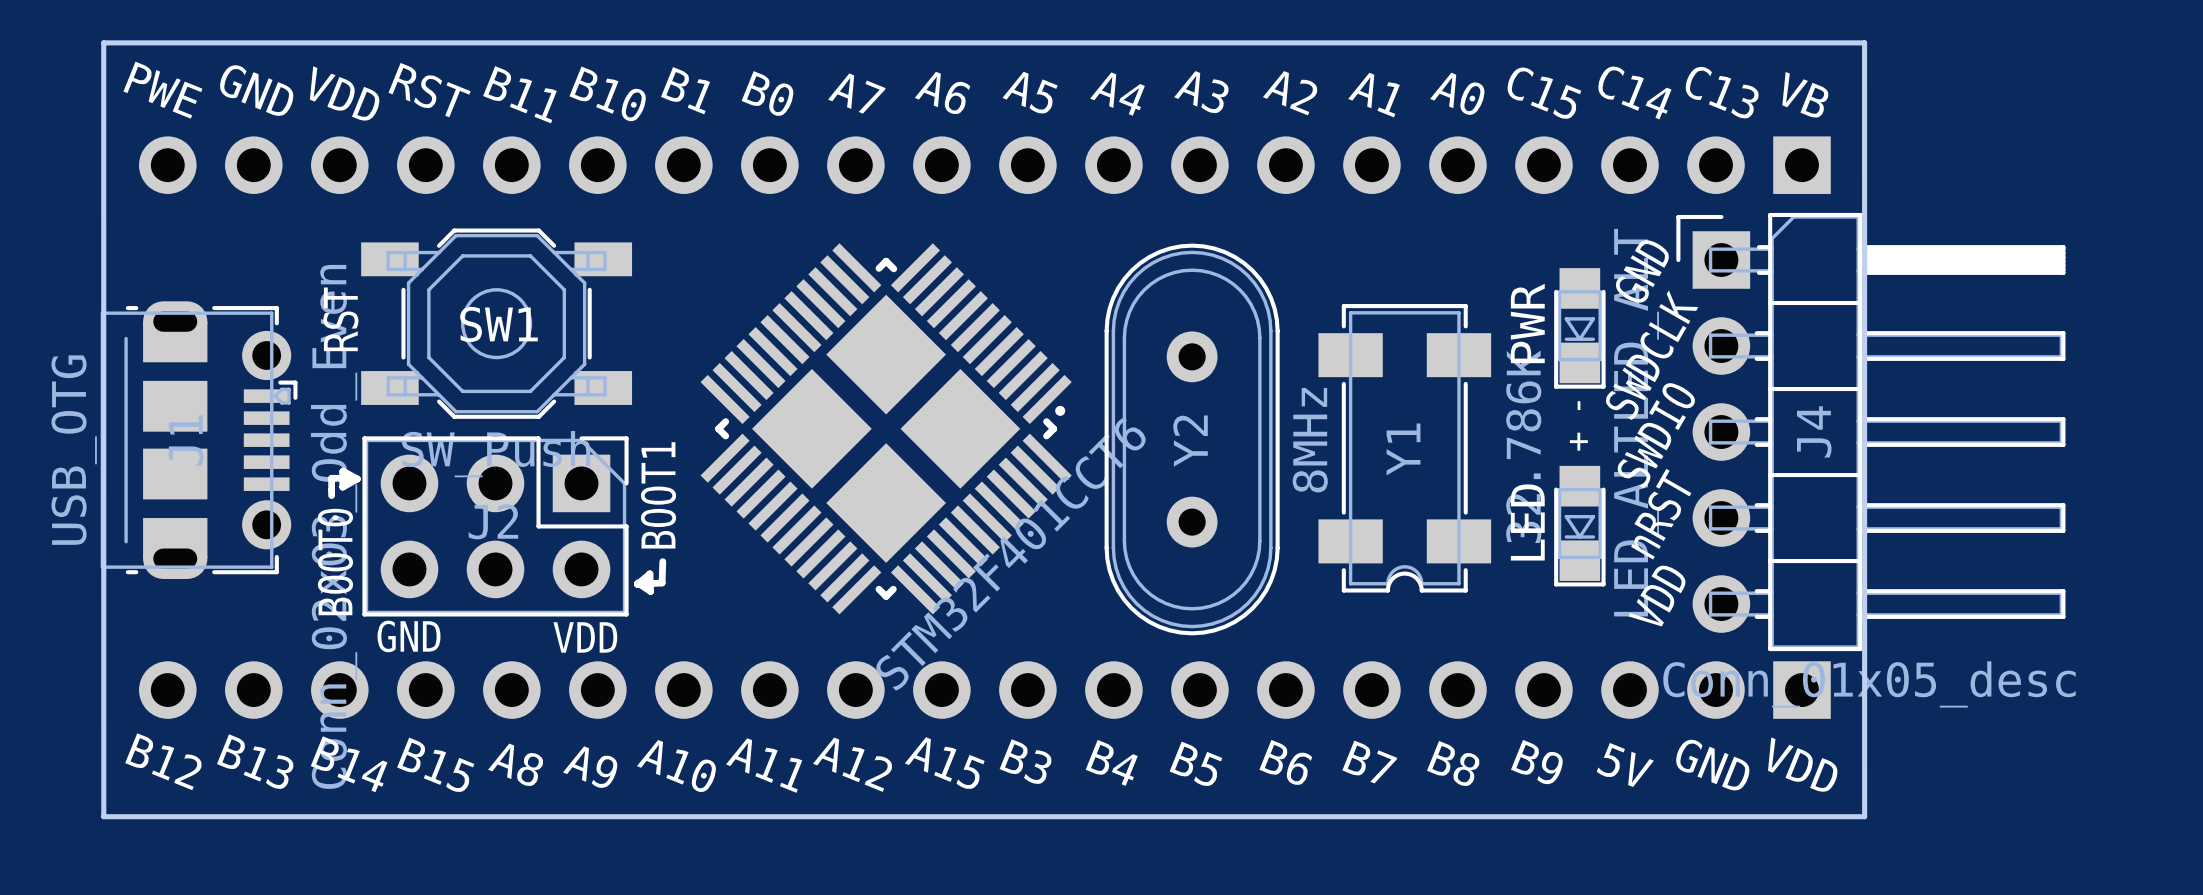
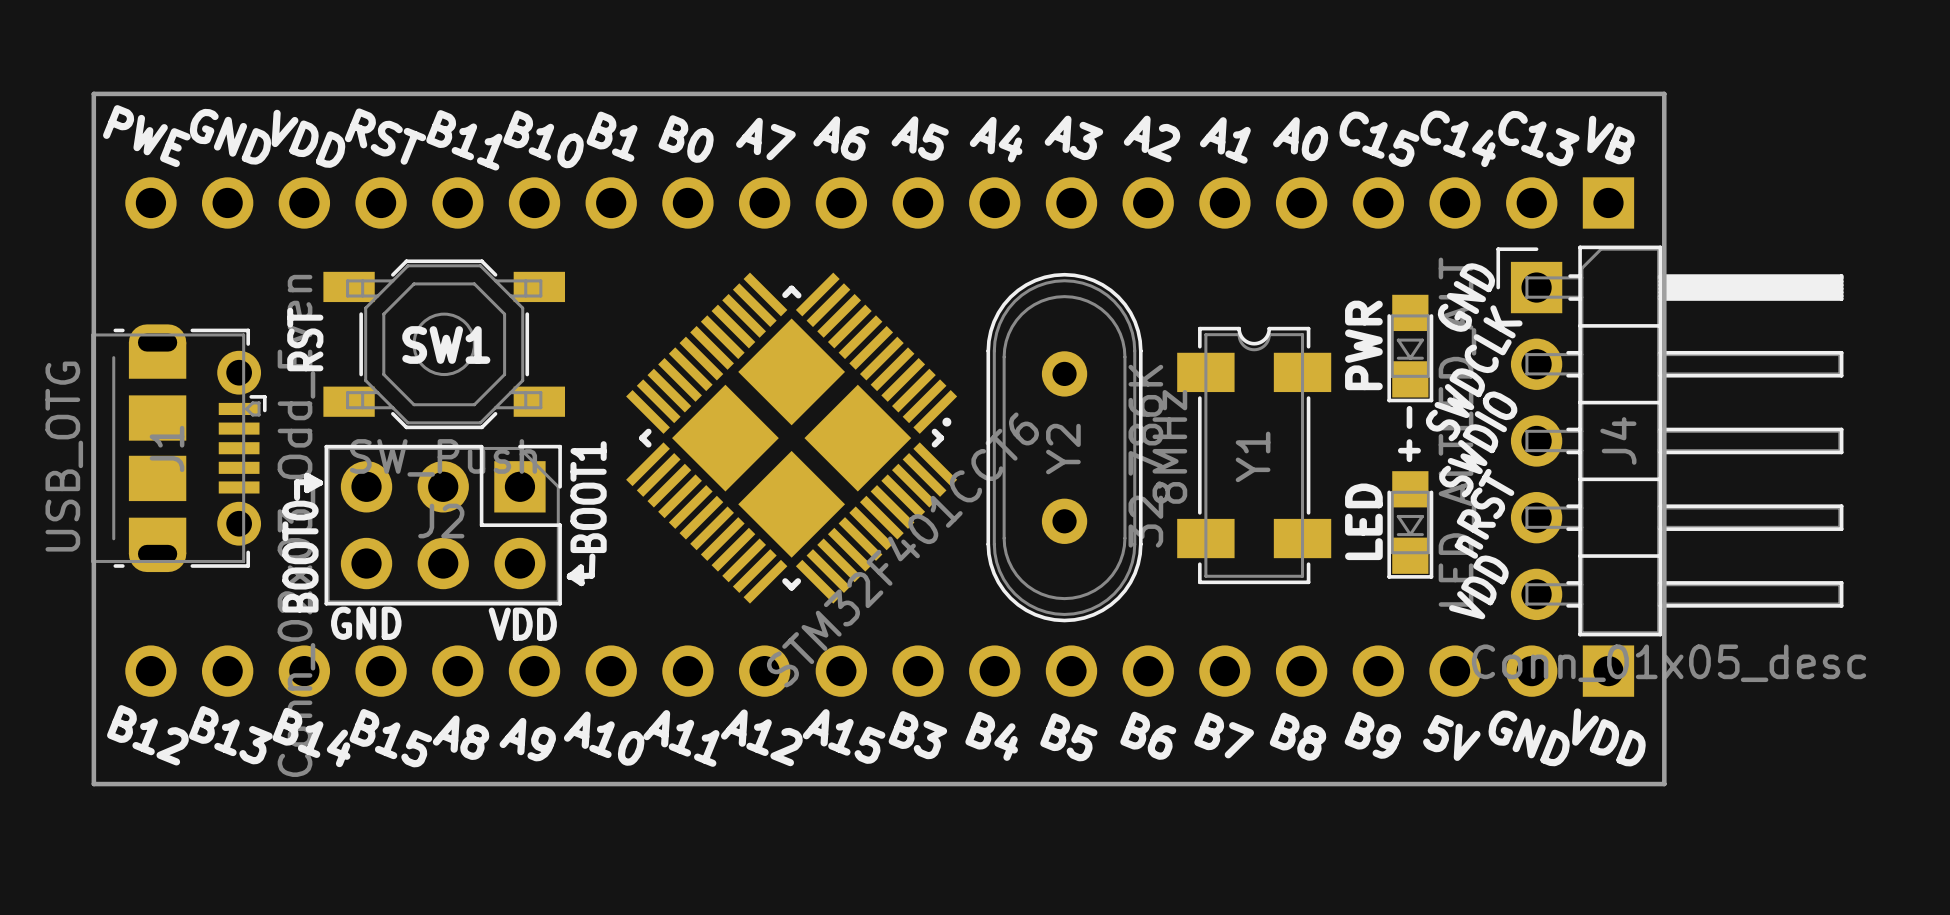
Y1 rotation: 0° (1404, 448) -> 180° (1254, 455)

